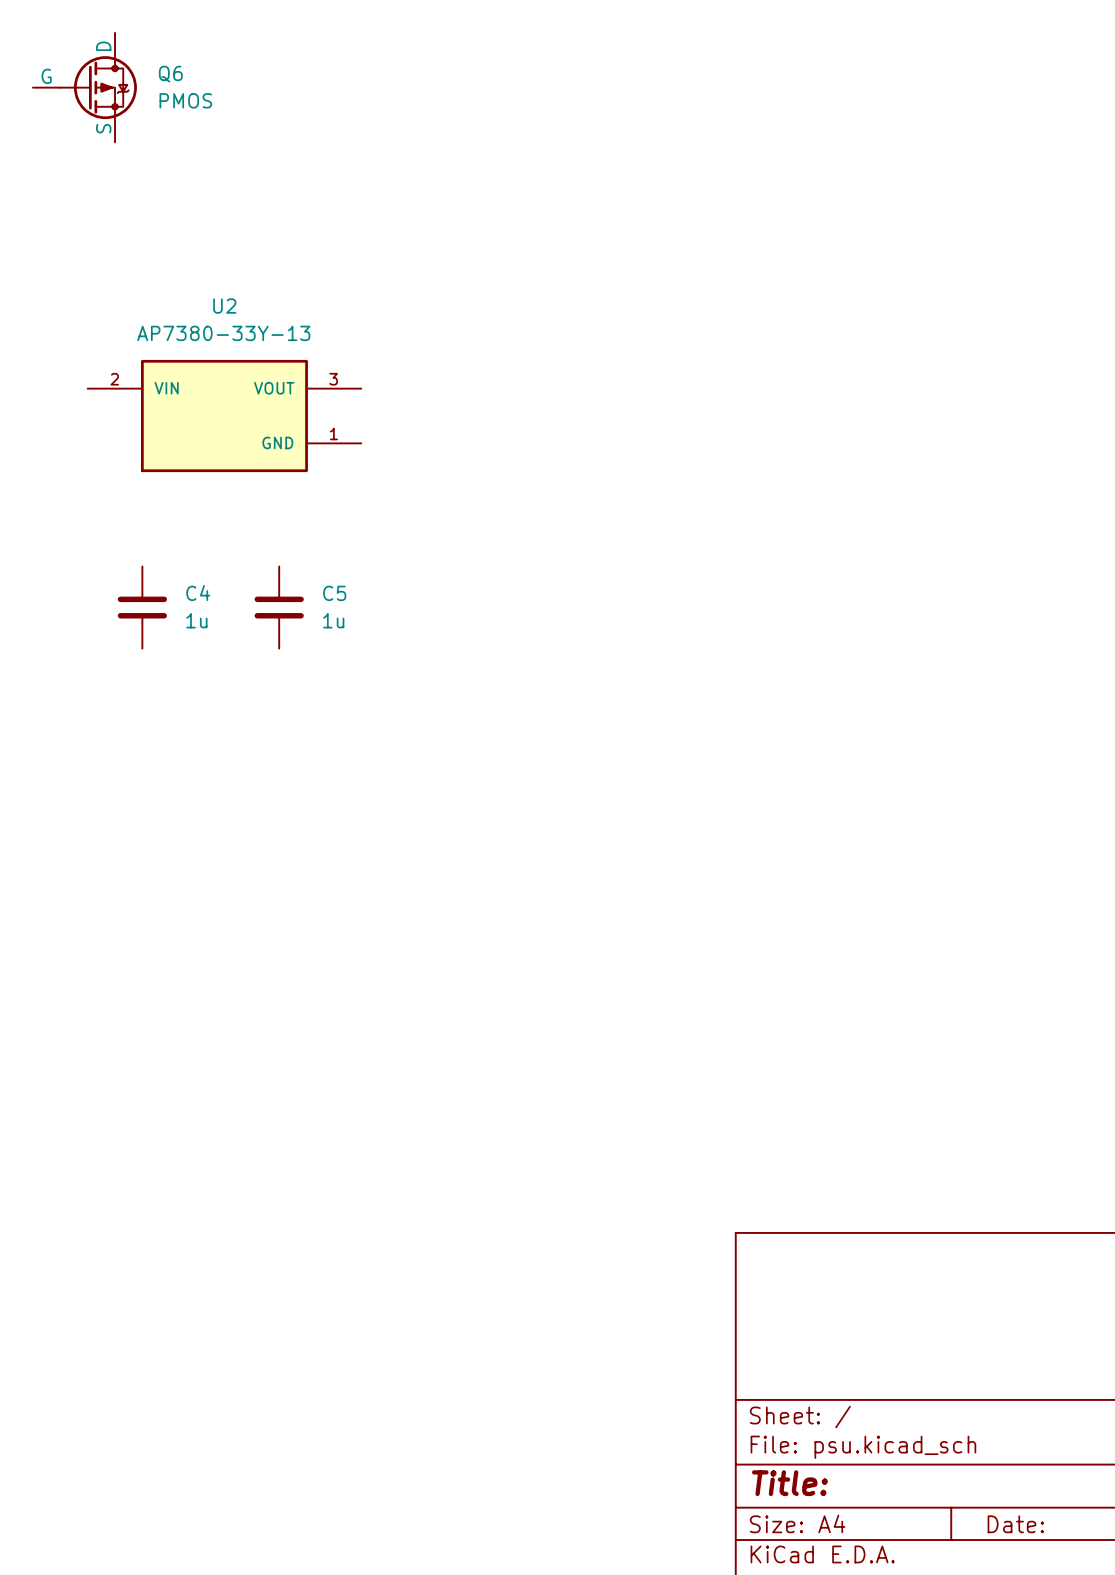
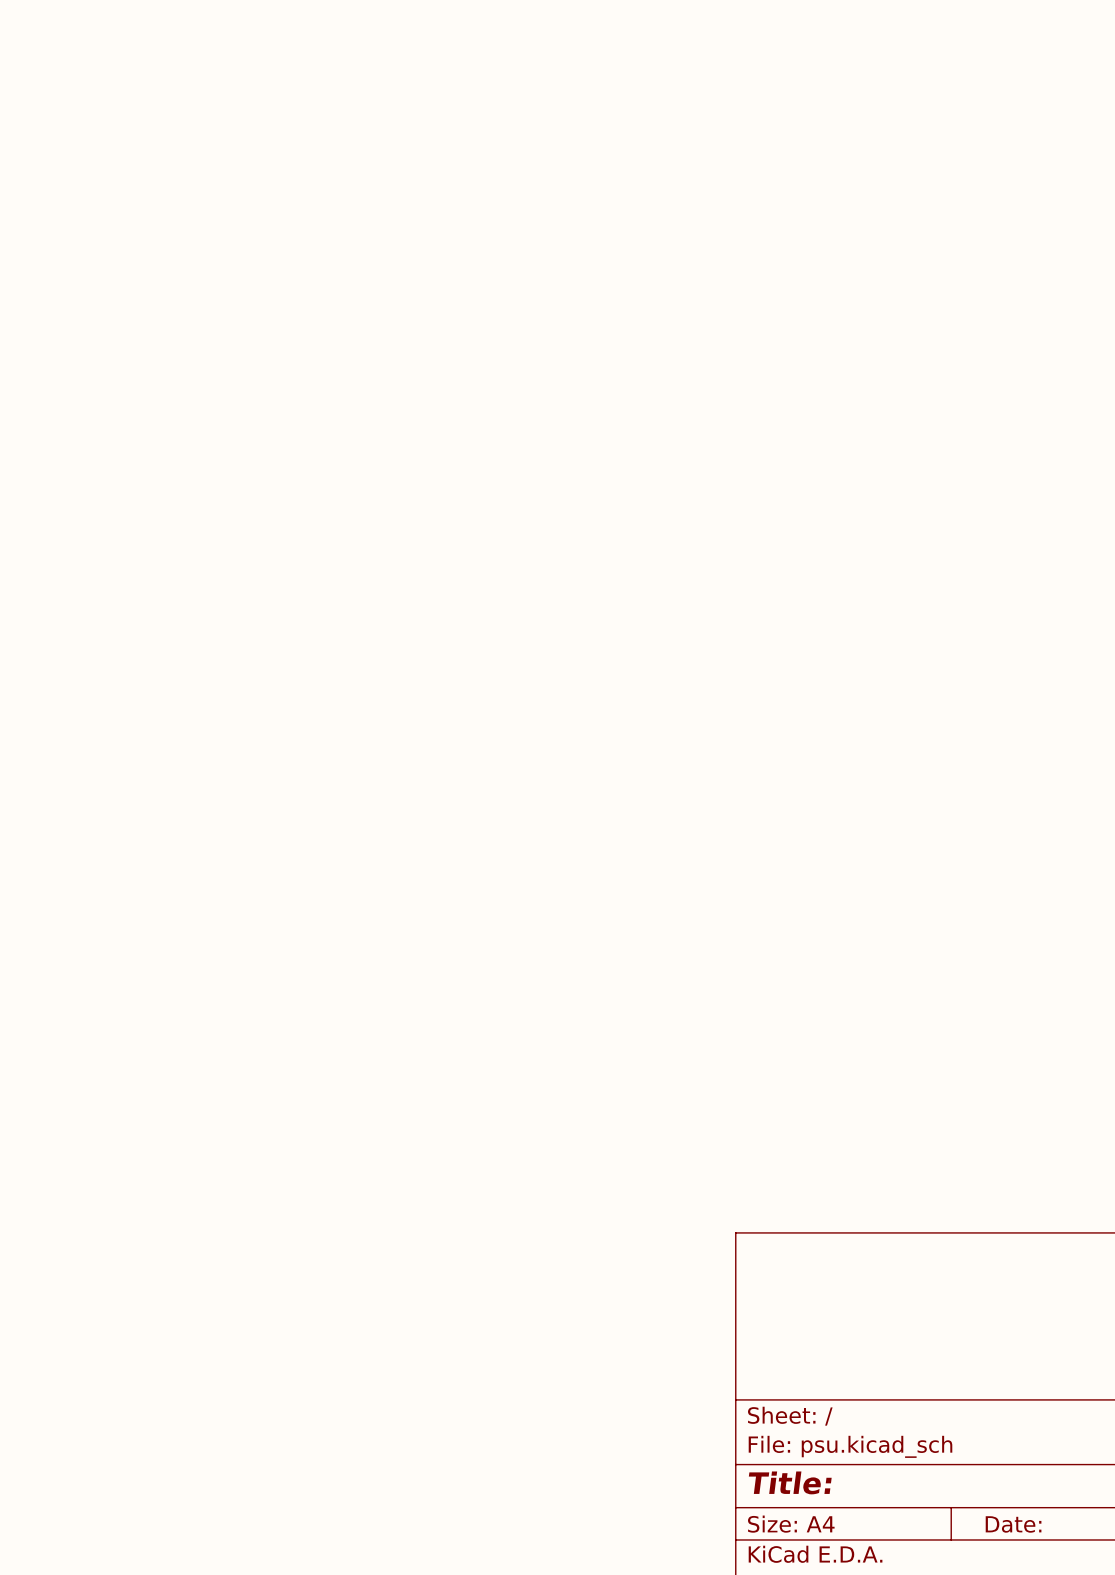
Q6: PMOS (84, 87) -> none
U2: AP7380-33Y-13 (224, 416) -> none
C4: 1u (142, 607) -> none
C5: 1u (279, 607) -> none

